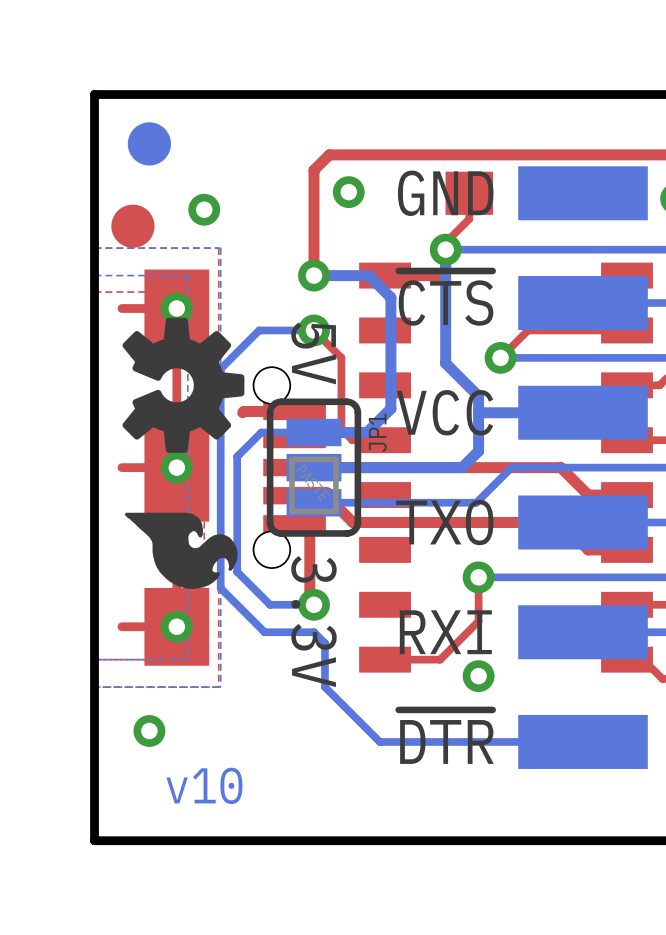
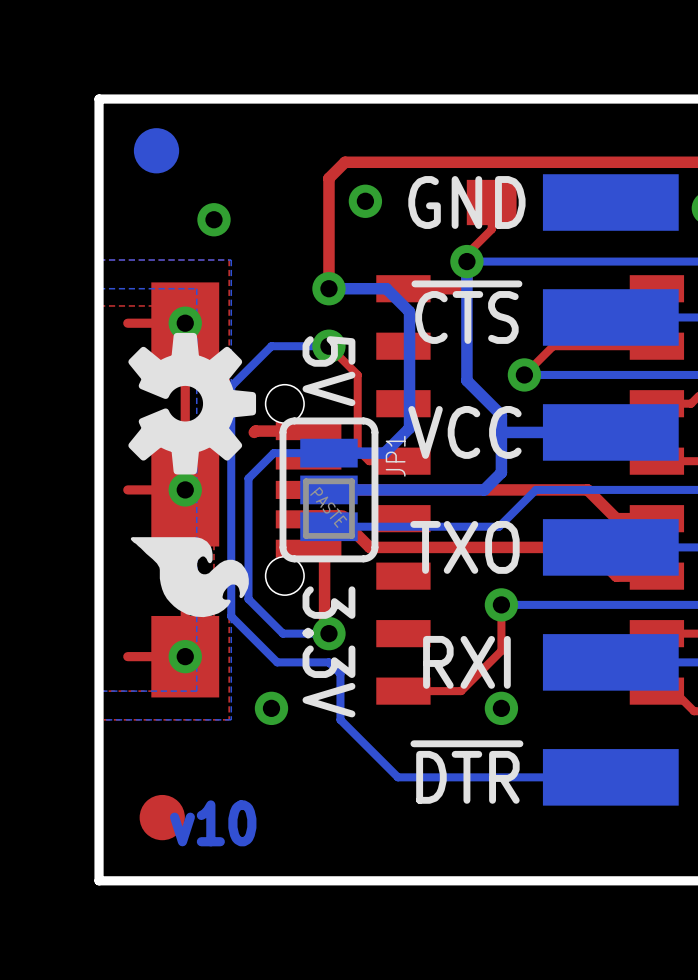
part position: (132, 226) -> (162, 817)
via position: (149, 731) -> (271, 708)

